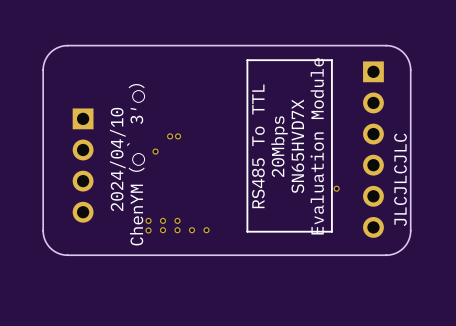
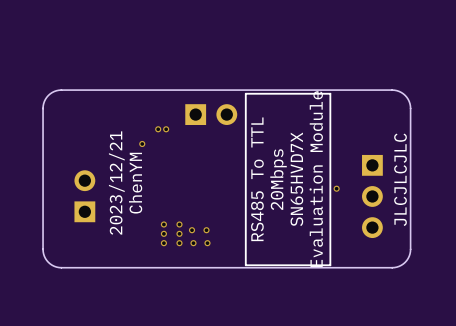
board edge: (386, 45) (67, 45) (54, 49) (45, 59) (43, 70) (43, 230) (46, 243) (54, 251) (67, 255) (386, 255) (399, 251) (406, 243) (410, 233) (410, 67) (406, 57) (401, 50) (386, 45) -> (392, 90) (405, 95) (410, 108) (410, 251) (406, 260) (399, 266) (61, 267) (52, 265) (44, 256) (43, 108) (46, 97) (54, 91) (392, 90)
line: (331, 60) (247, 60) (247, 231) (331, 231) (331, 60) -> (330, 93) (245, 93) (245, 265) (330, 265) (330, 93)
part: none -> (211, 114)
via: none -> (158, 129)
via: none -> (166, 129)
via: (170, 136) -> none
via: (178, 136) -> none
via: none -> (142, 143)
text position: RS485 To TTL (258, 146) -> RS485 To TTL (257, 179)
text position: 20Mbps (279, 146) -> 20Mbps (278, 179)
text position: SN65HVD7X (297, 146) -> SN65HVD7X (296, 179)
text position: Evaluation Module (317, 146) -> Evaluation Module (316, 179)
part: (373, 149) -> none
via: (155, 151) -> none
text: 2024/04/10 (117, 159) -> none
text: ChenYM（○｀ 3′○） (136, 164) -> none
part: (83, 165) -> none
text: none -> 2023/12/21 (116, 183)
text: none -> ChenYM (135, 183)
part: none -> (84, 196)
part: none -> (372, 196)
via: (148, 220) -> none
via: (163, 220) -> none
via: (177, 220) -> none
via: none -> (163, 224)
via: none -> (179, 224)
via: (148, 230) -> none
via: (163, 230) -> none
via: (177, 230) -> none
via: none -> (163, 233)
via: none -> (179, 233)
via: none -> (163, 243)
via: none -> (179, 243)
via: none -> (193, 243)
via: none -> (207, 243)

